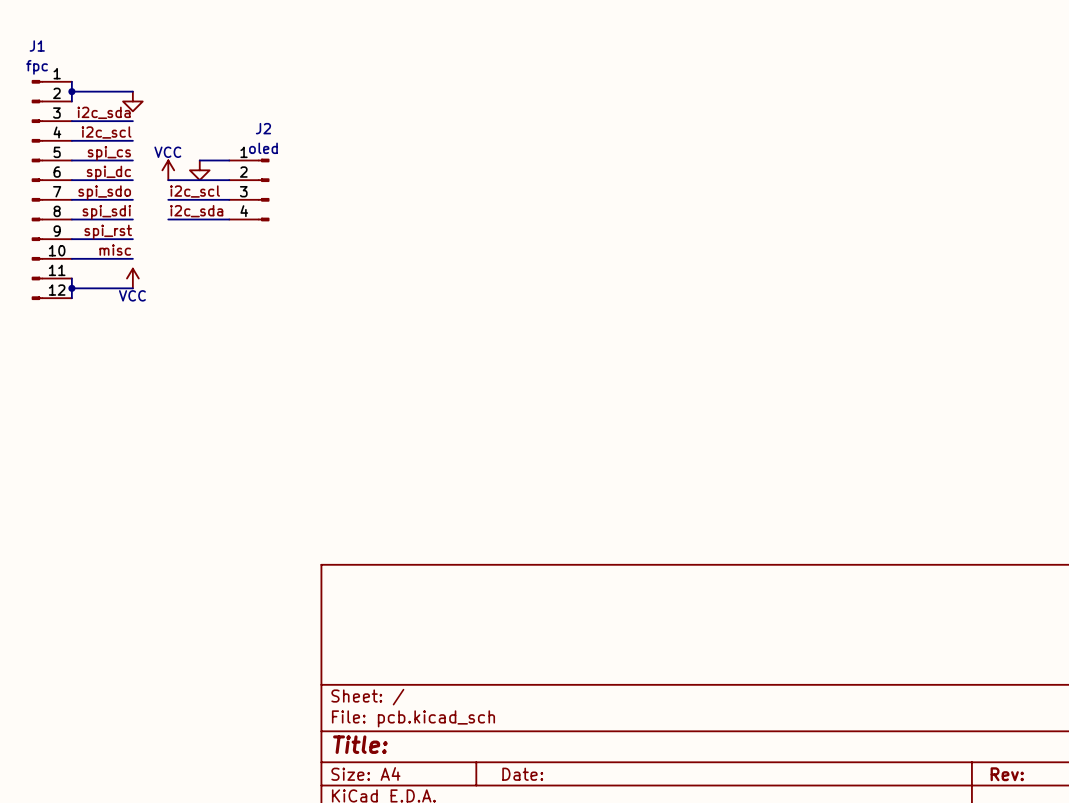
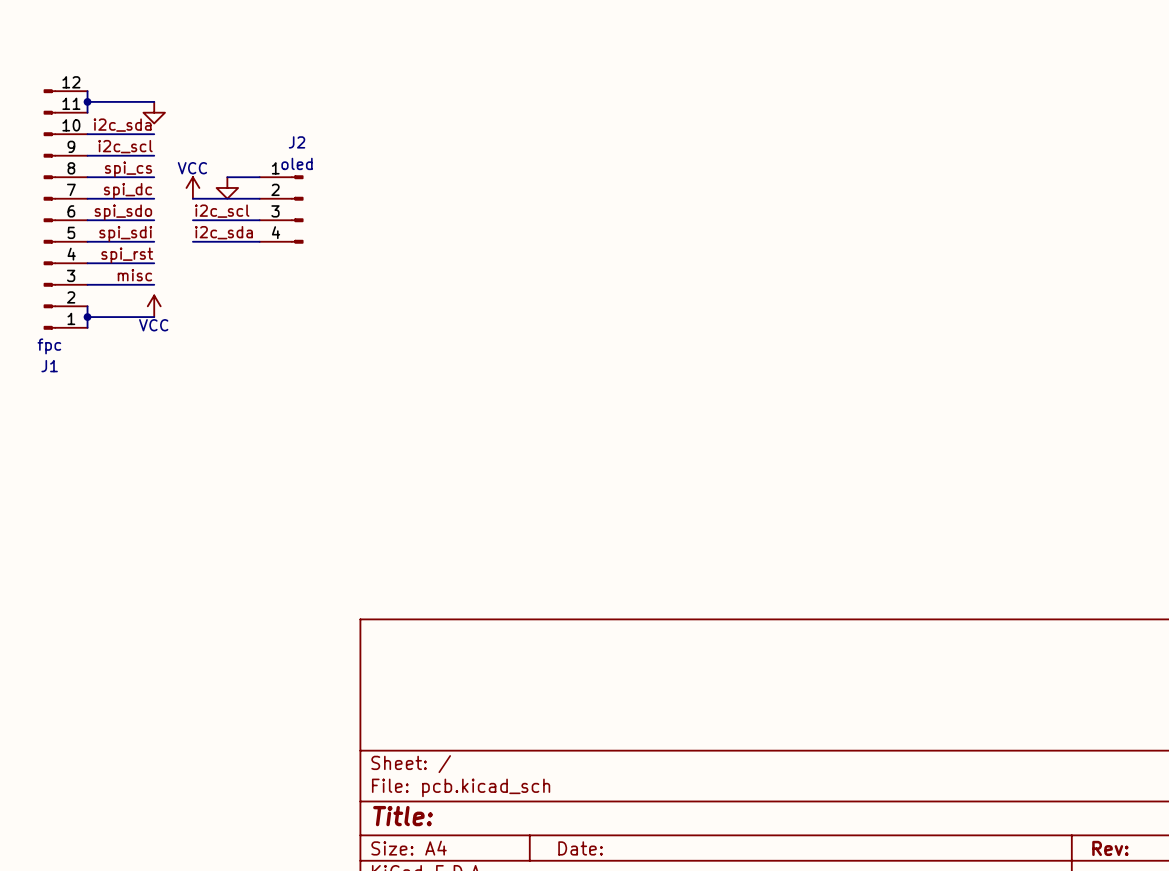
J1 flip: as is (37, 189) -> up-down (49, 209)

